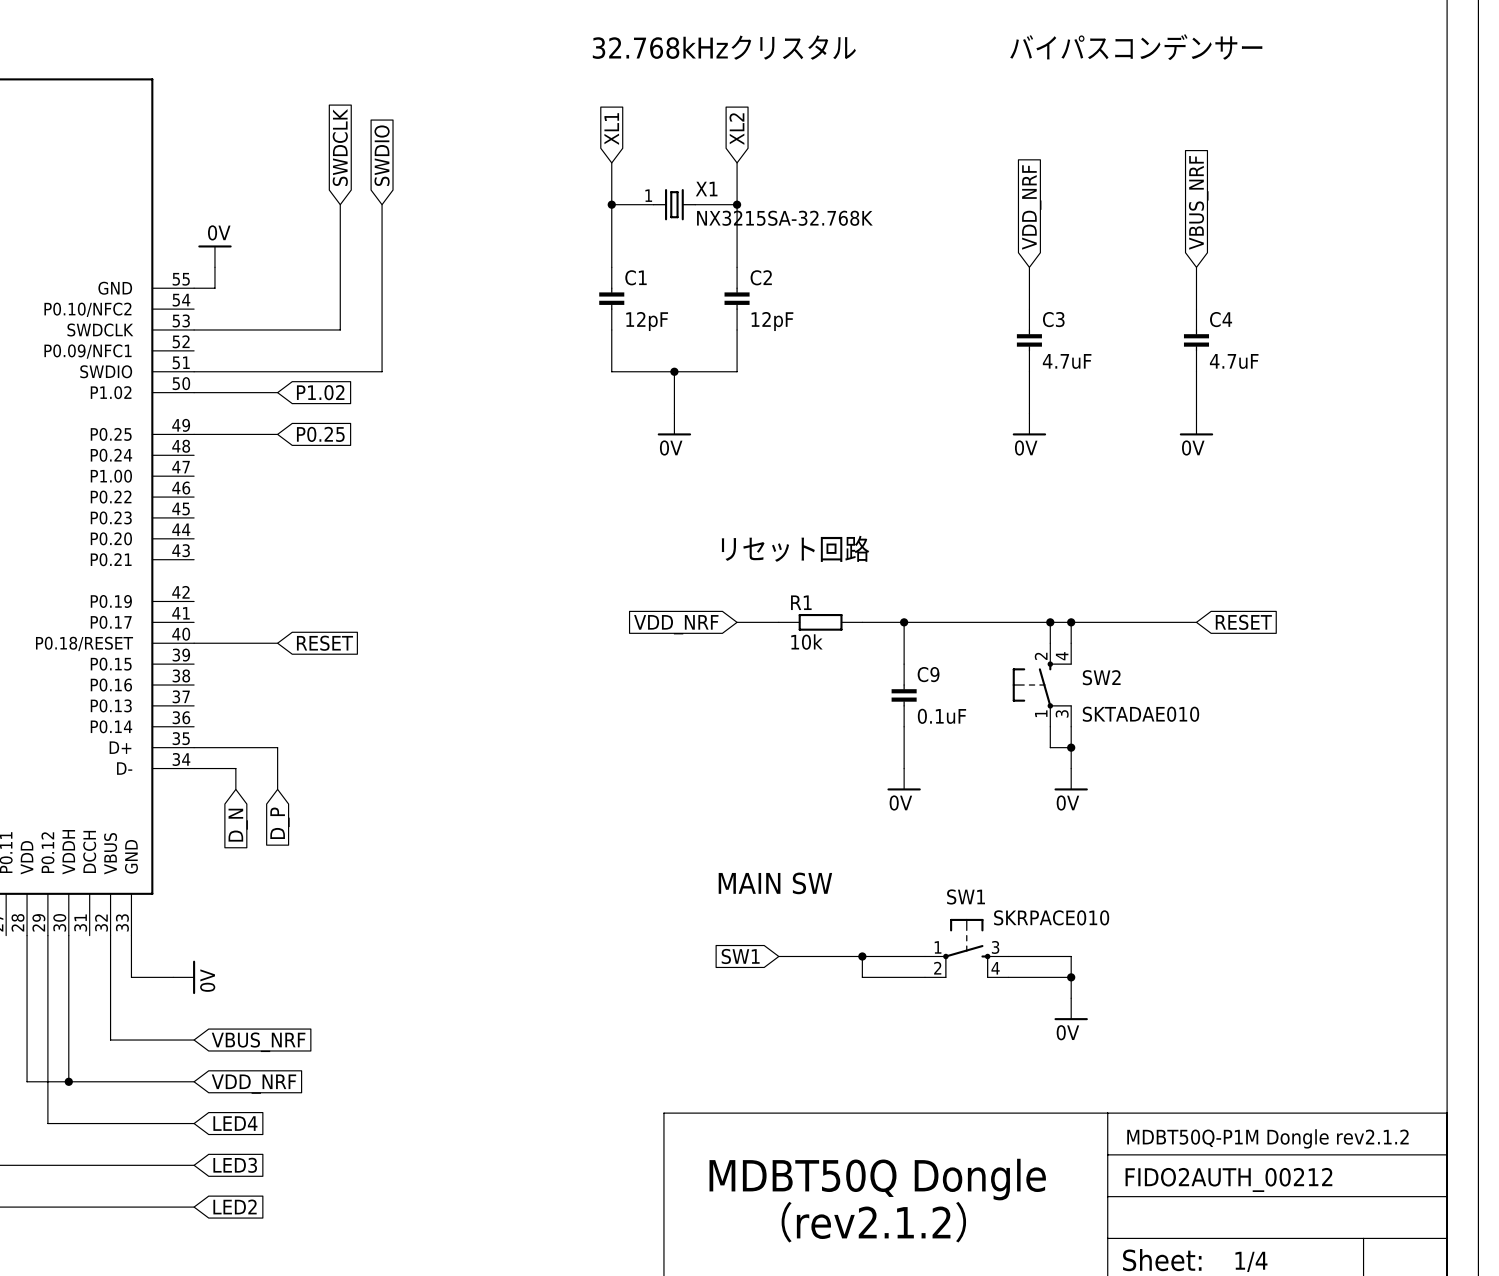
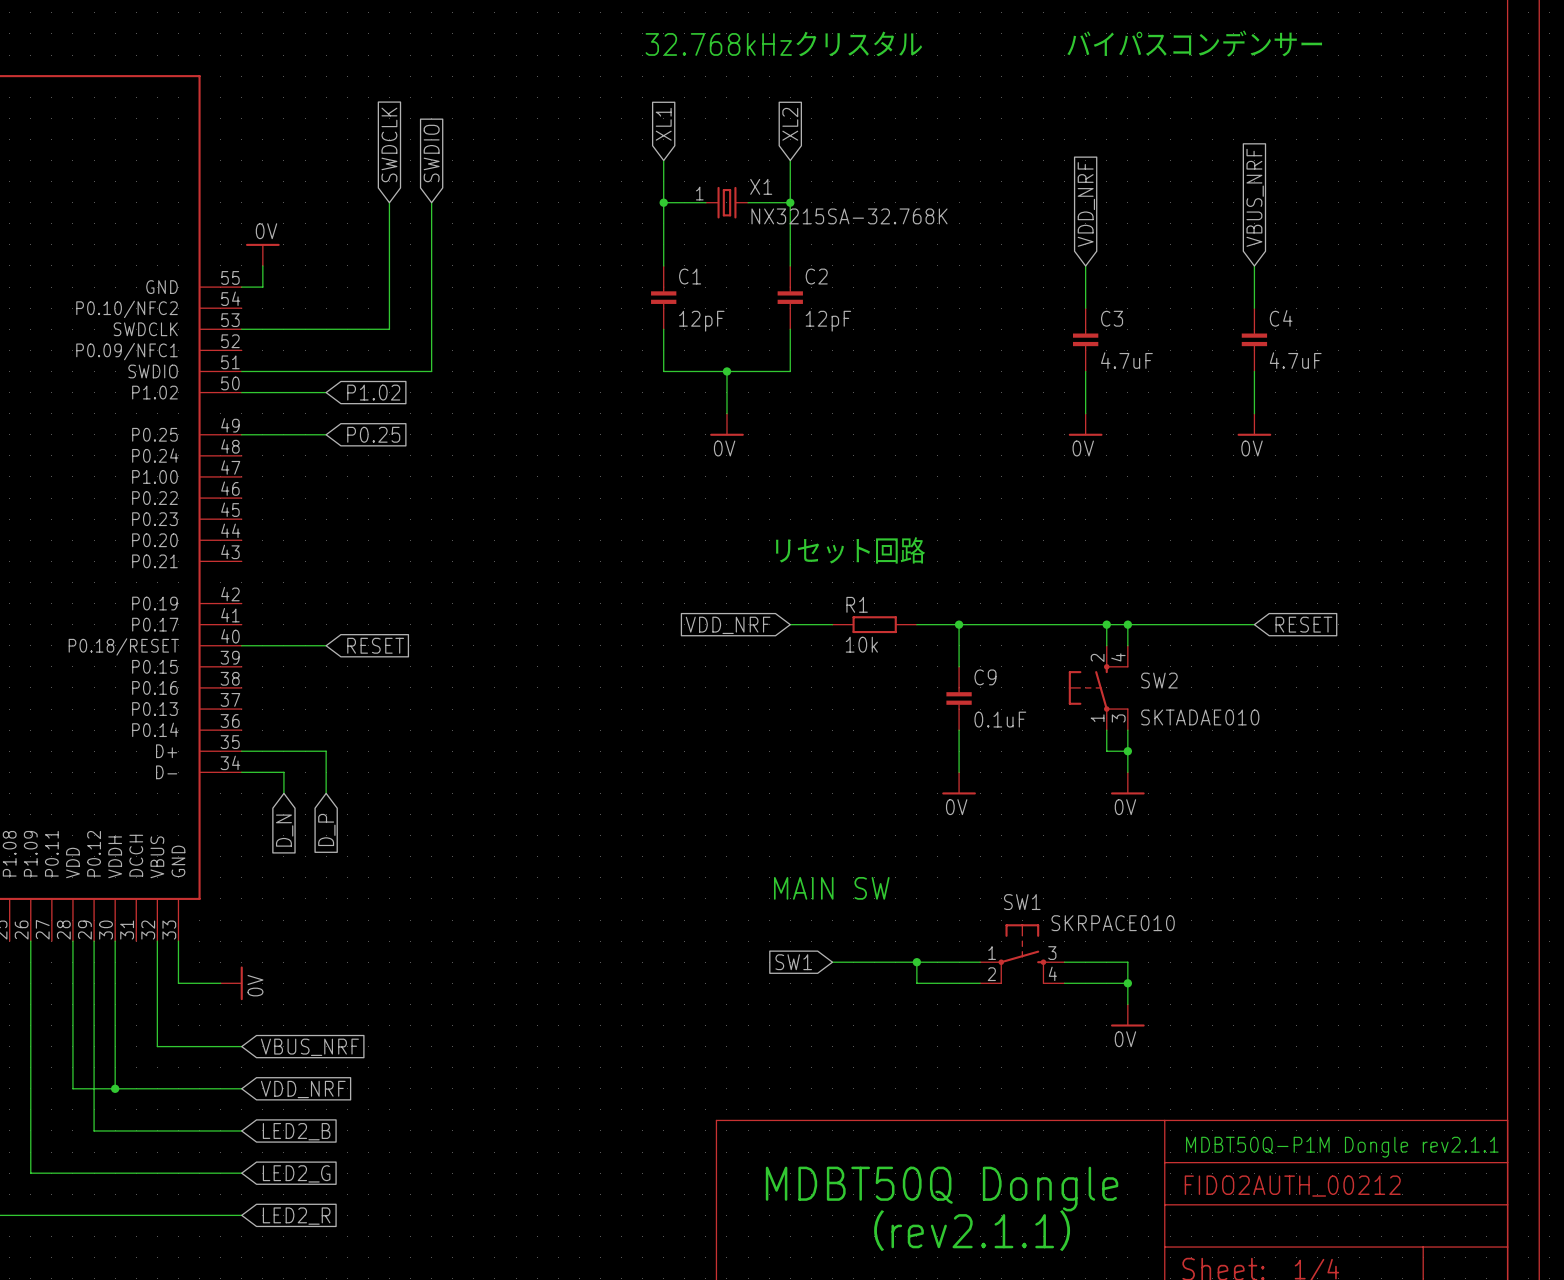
global label: LED4 (235, 1123) -> LED2_B (296, 1131)
text: MDBT50Q-P1M Dongle rev2.1.2 (1267, 1138) -> MDBT50Q-P1M Dongle rev2.1.1 (1342, 1147)
global label: LED3 (235, 1165) -> LED2_G (296, 1173)
global label: LED2 (235, 1206) -> LED2_R (296, 1216)
text: （rev2.1.2） (873, 1222) -> （rev2.1.1） (972, 1230)

